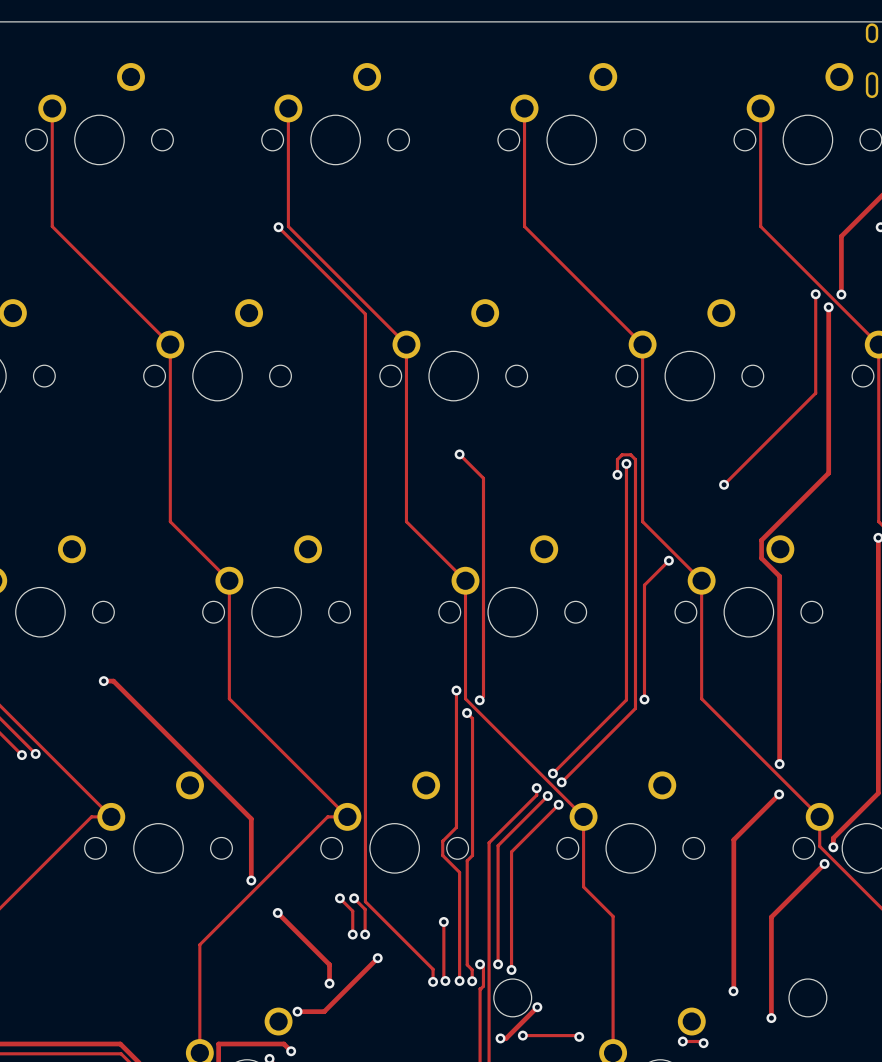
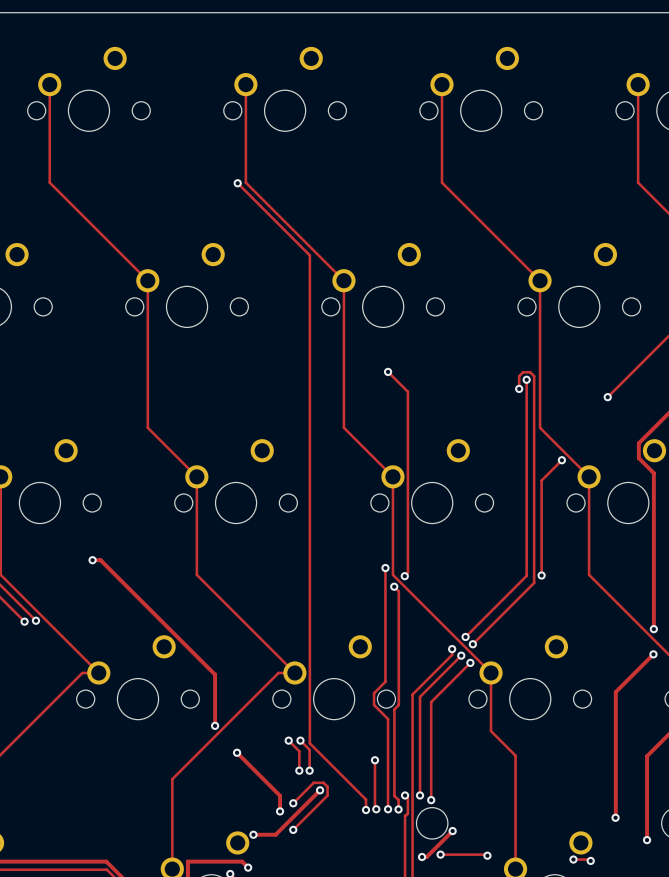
track: none -> (293, 803) (313, 782) (323, 782) (327, 786) (327, 795) (293, 829)
via: none -> (293, 803)
via: none -> (293, 829)

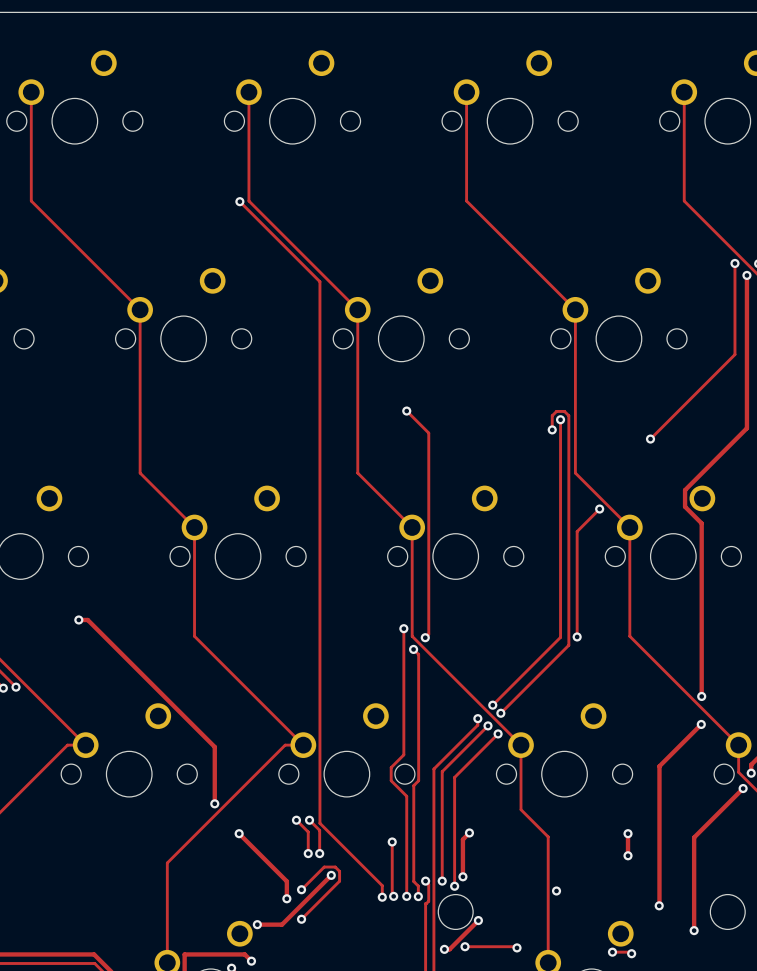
track: none -> (469, 832) (462, 839) (462, 876)
via: none -> (469, 832)
track: none -> (628, 833) (628, 855)
via: none -> (628, 833)
via: none -> (628, 855)
via: none -> (462, 876)
via: none -> (556, 890)

